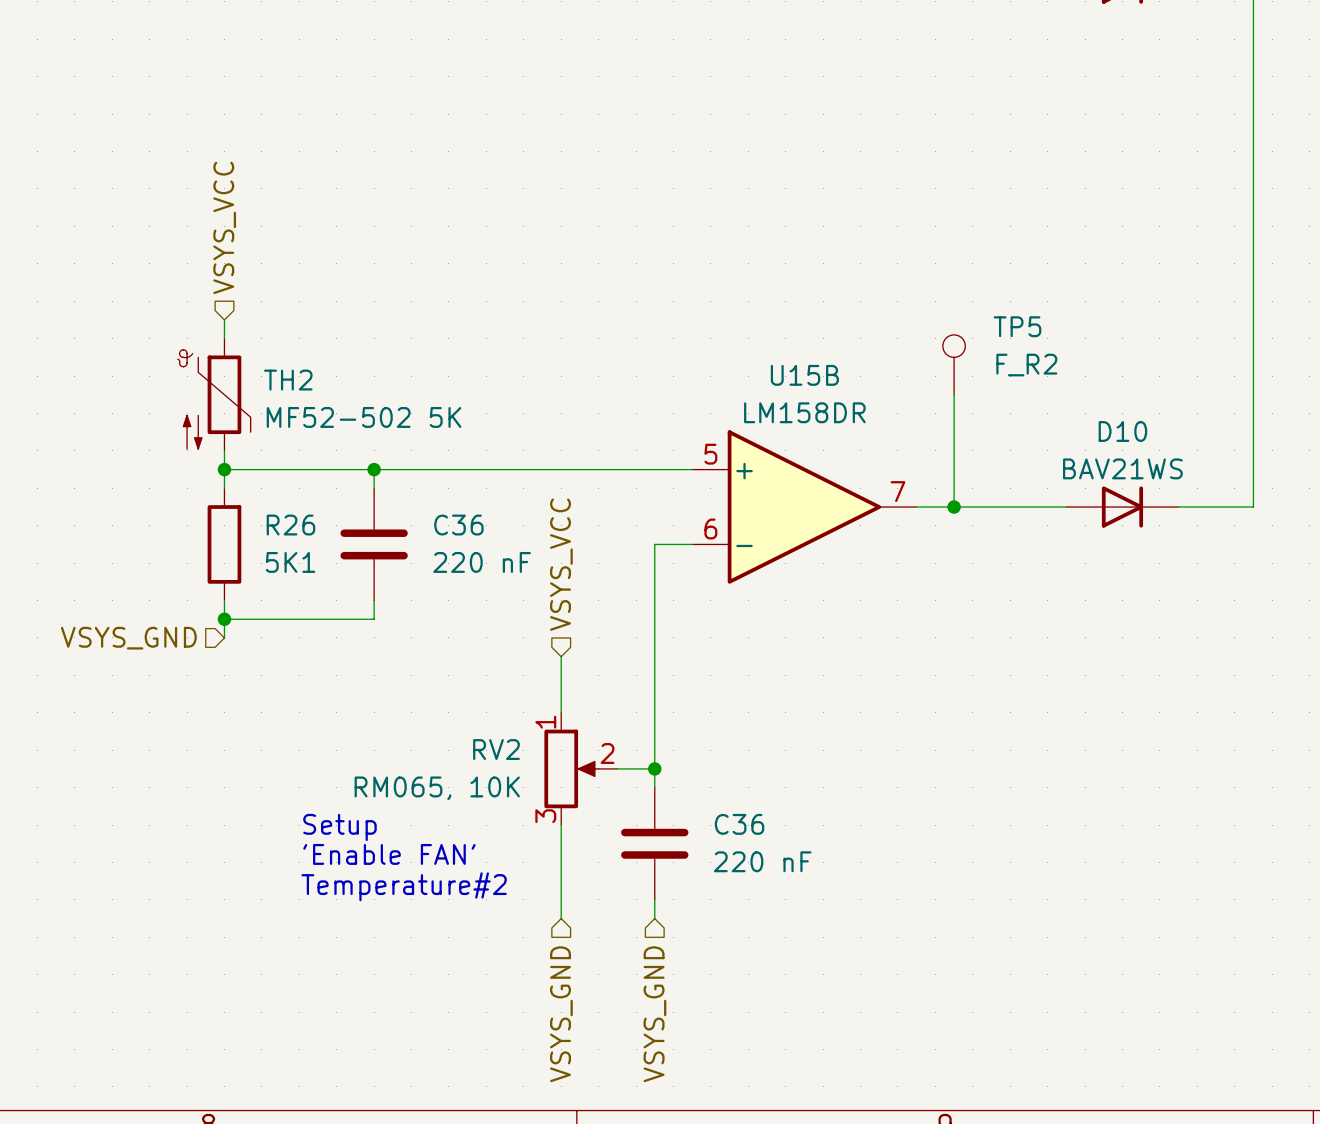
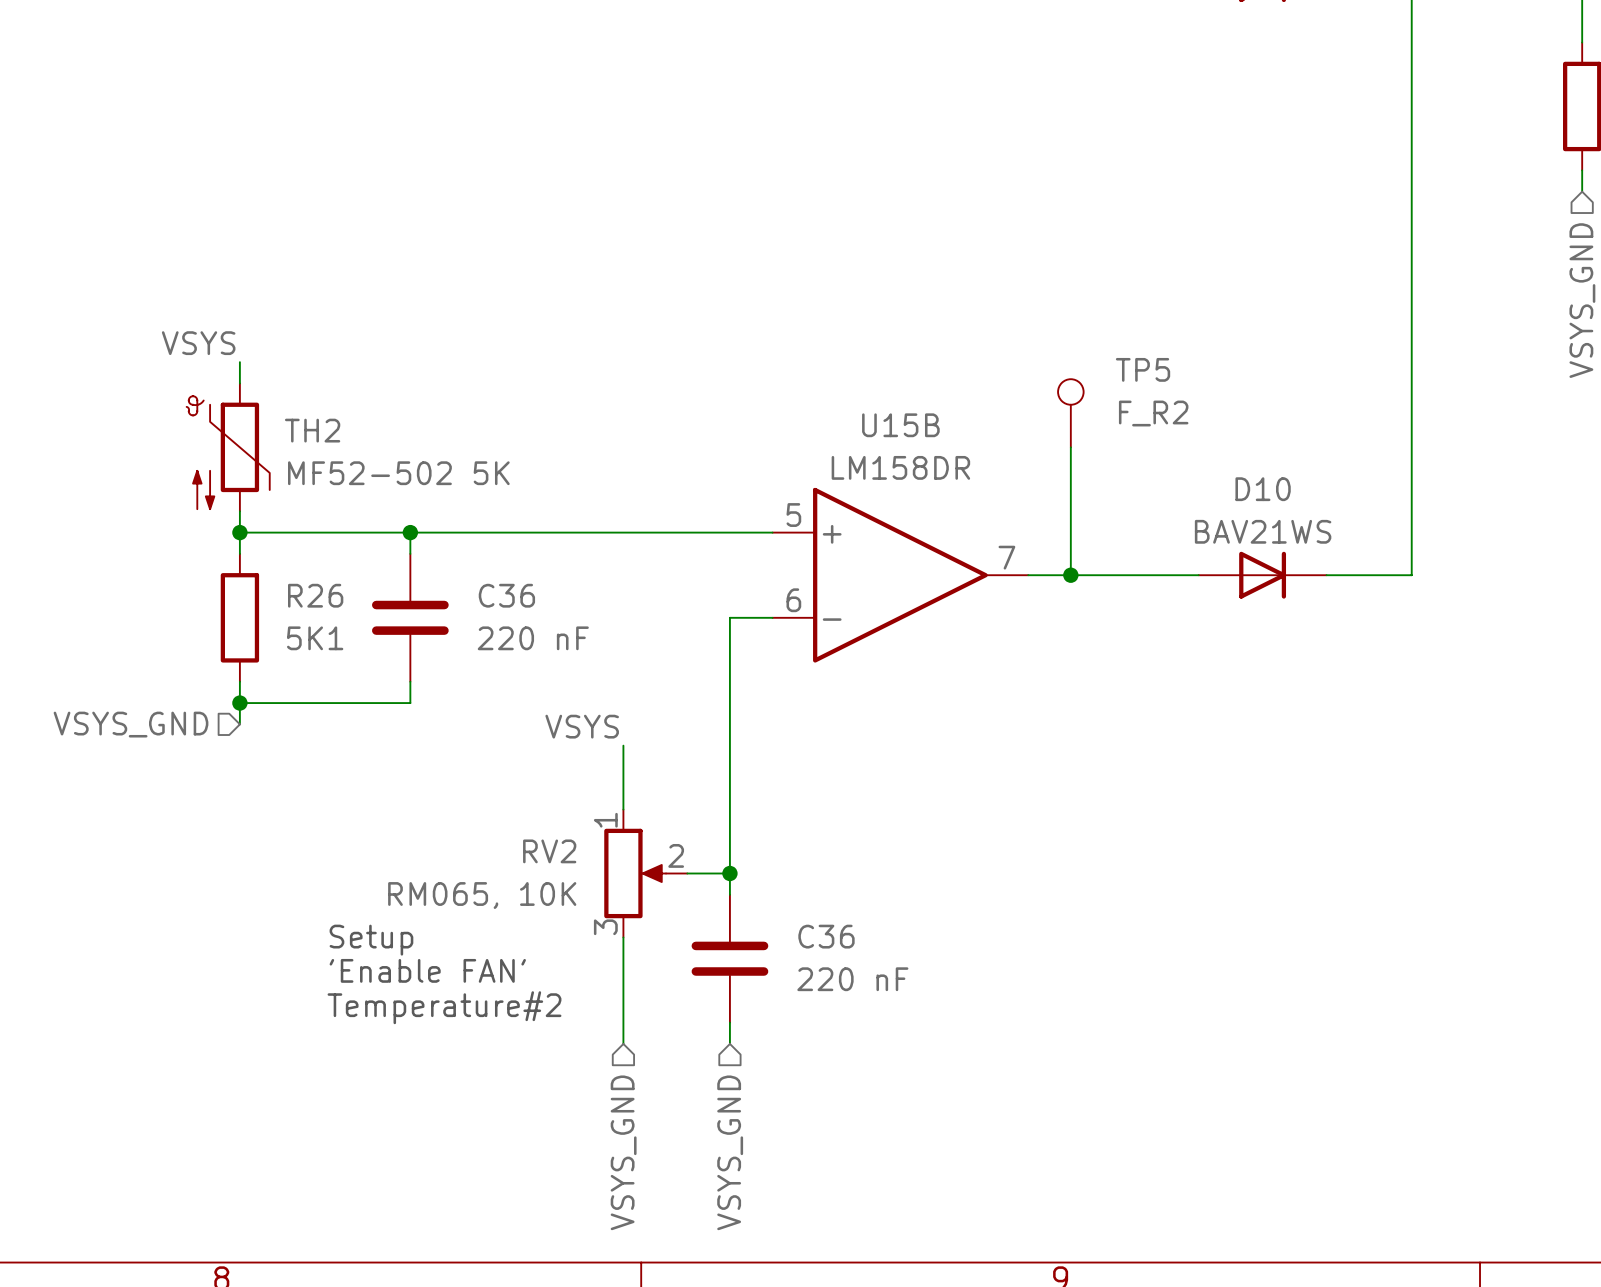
hierarchical label: VSYS_VCC (224, 227) -> none
label: none -> VSYS (198, 343)
hierarchical label: VSYS_VCC (561, 564) -> none
label: none -> VSYS (582, 726)

